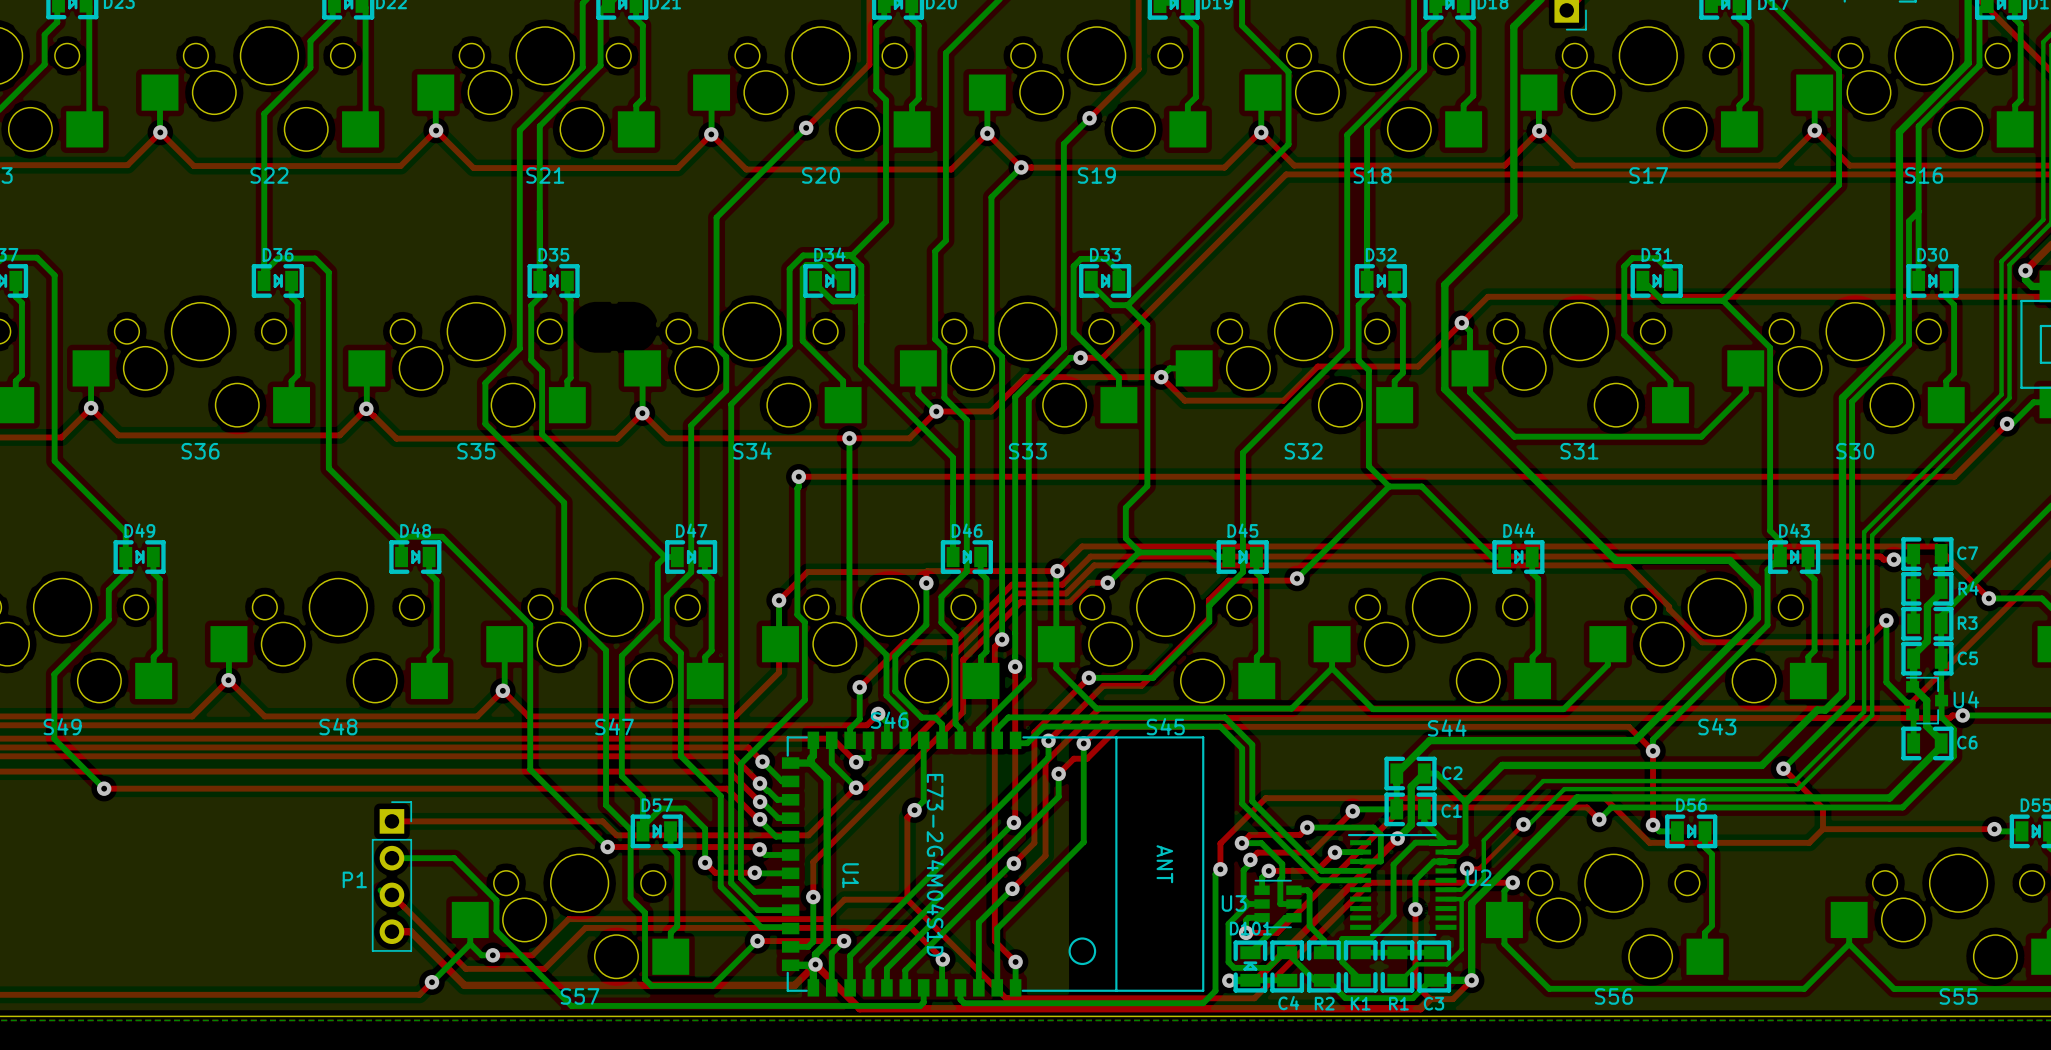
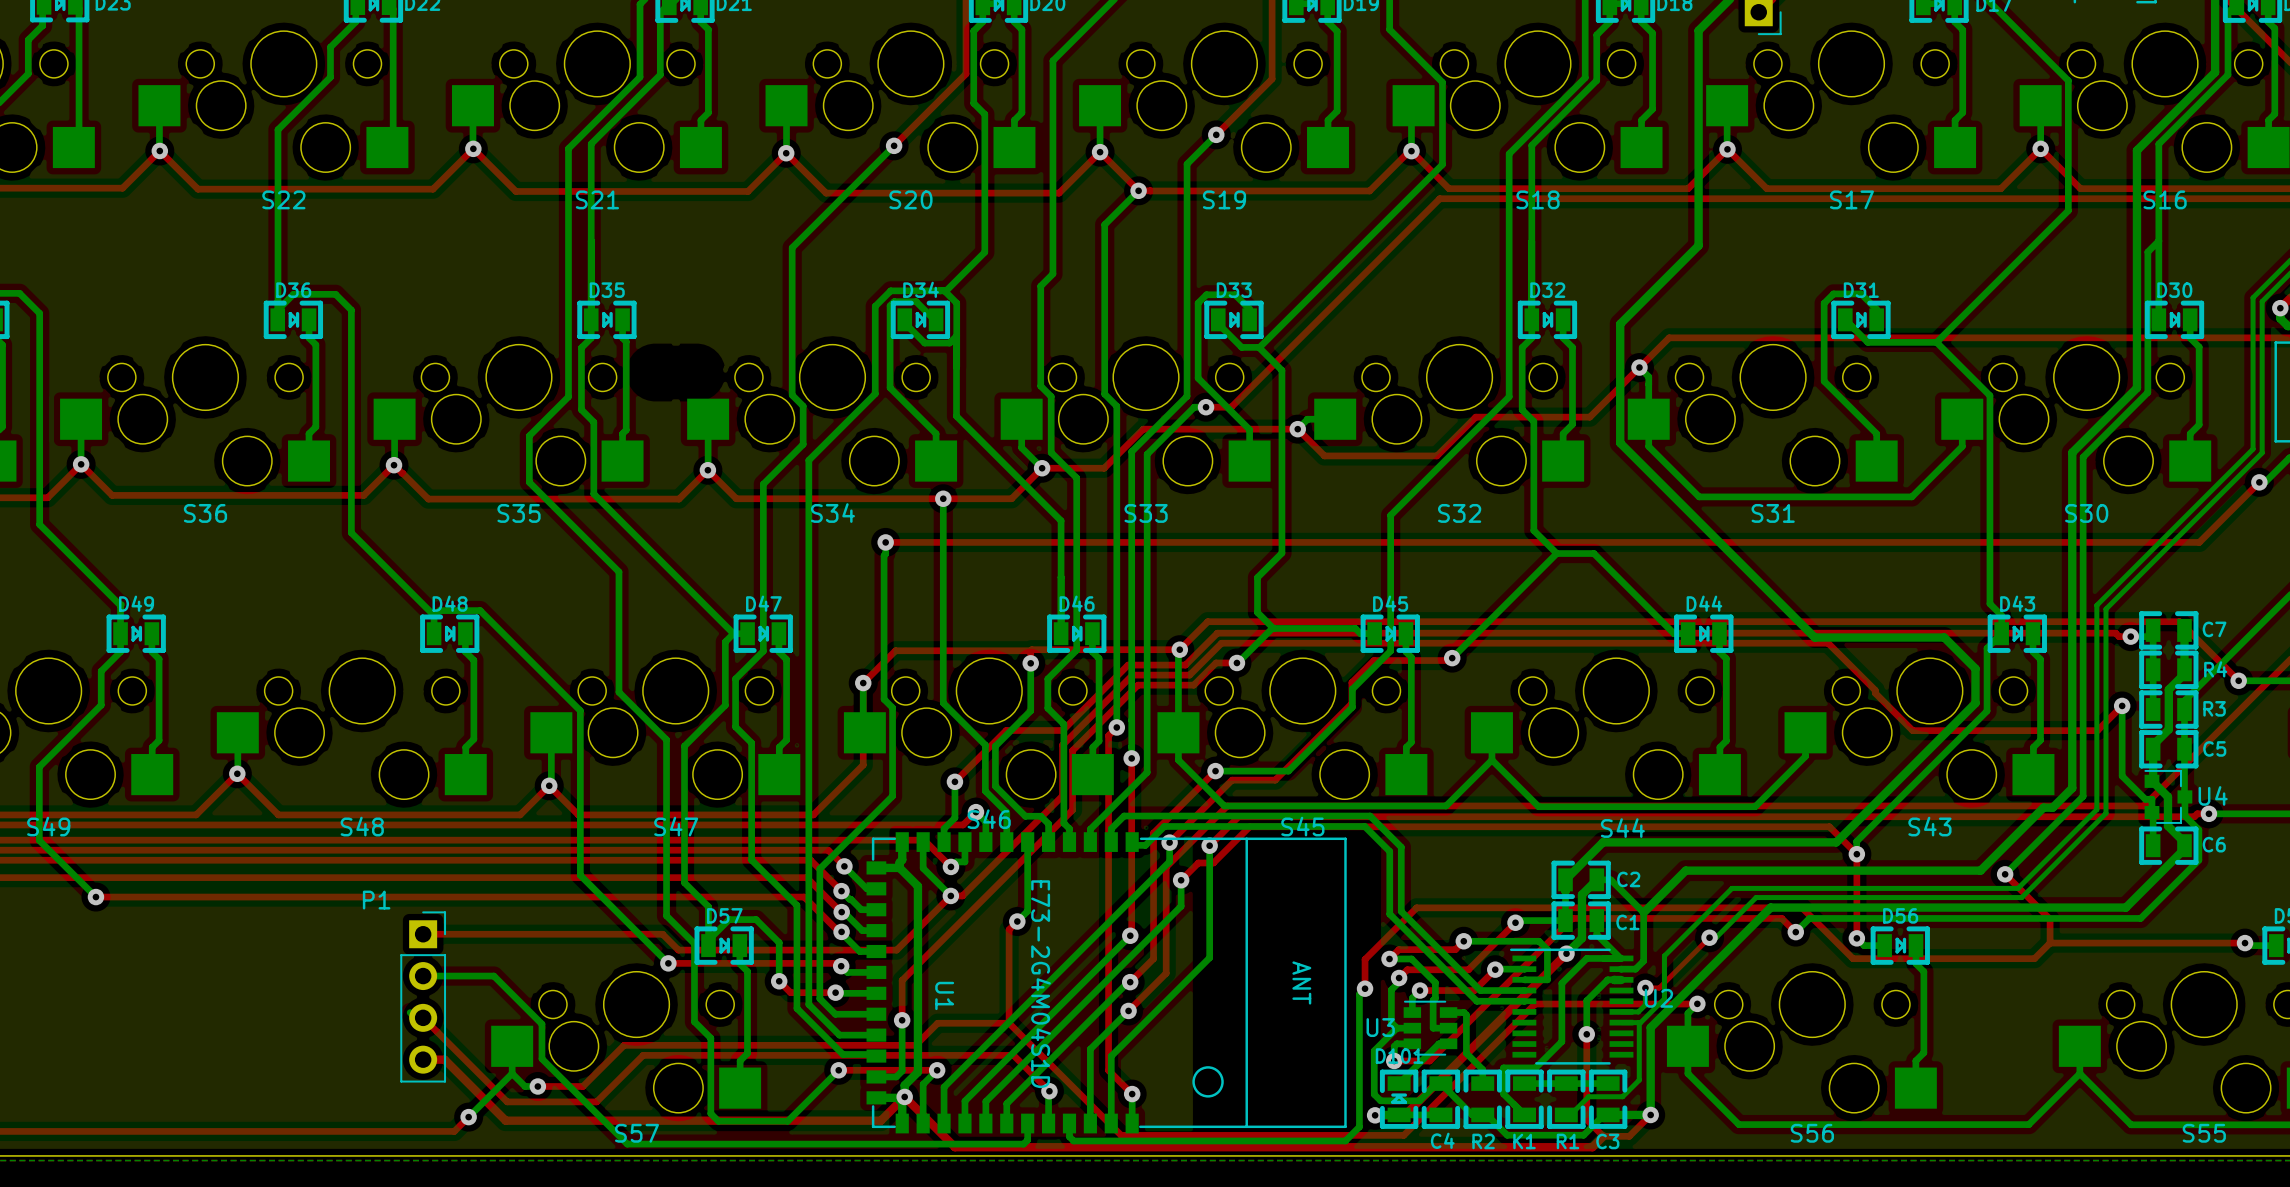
P1 name position: P1 (354, 879) -> P1 (376, 900)

